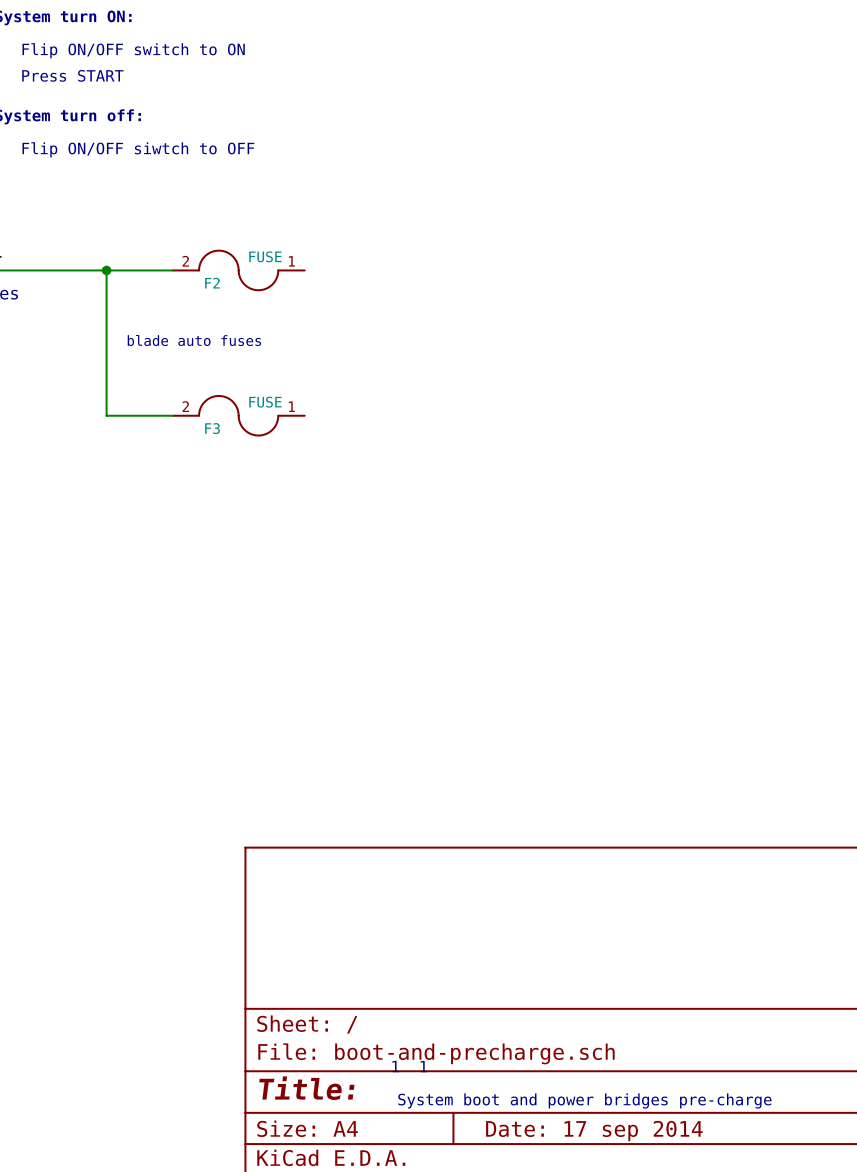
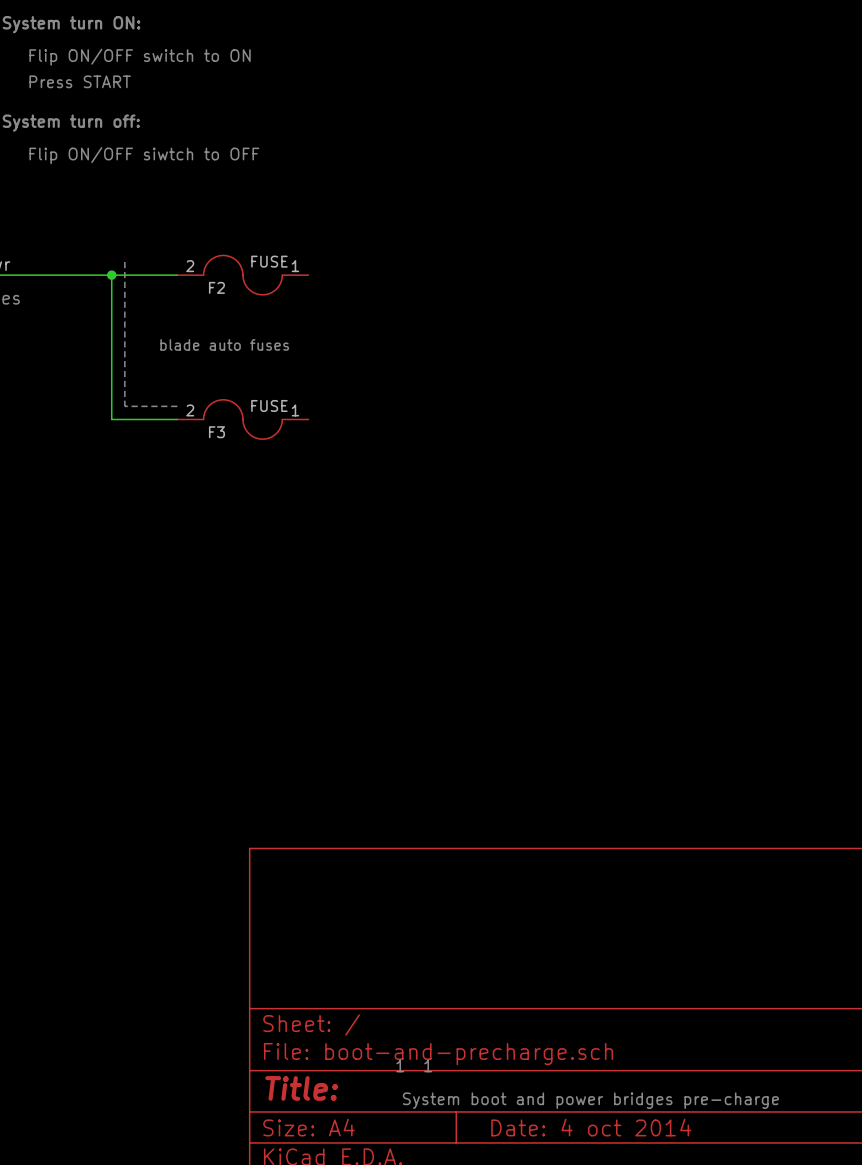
line: none -> (124, 262) (124, 406) (177, 406)
text position: blade auto fuses (194, 340) -> blade auto fuses (224, 344)
title block: Date: 17 sep 2014 (594, 1130) -> Date: 4 oct 2014 (591, 1127)

